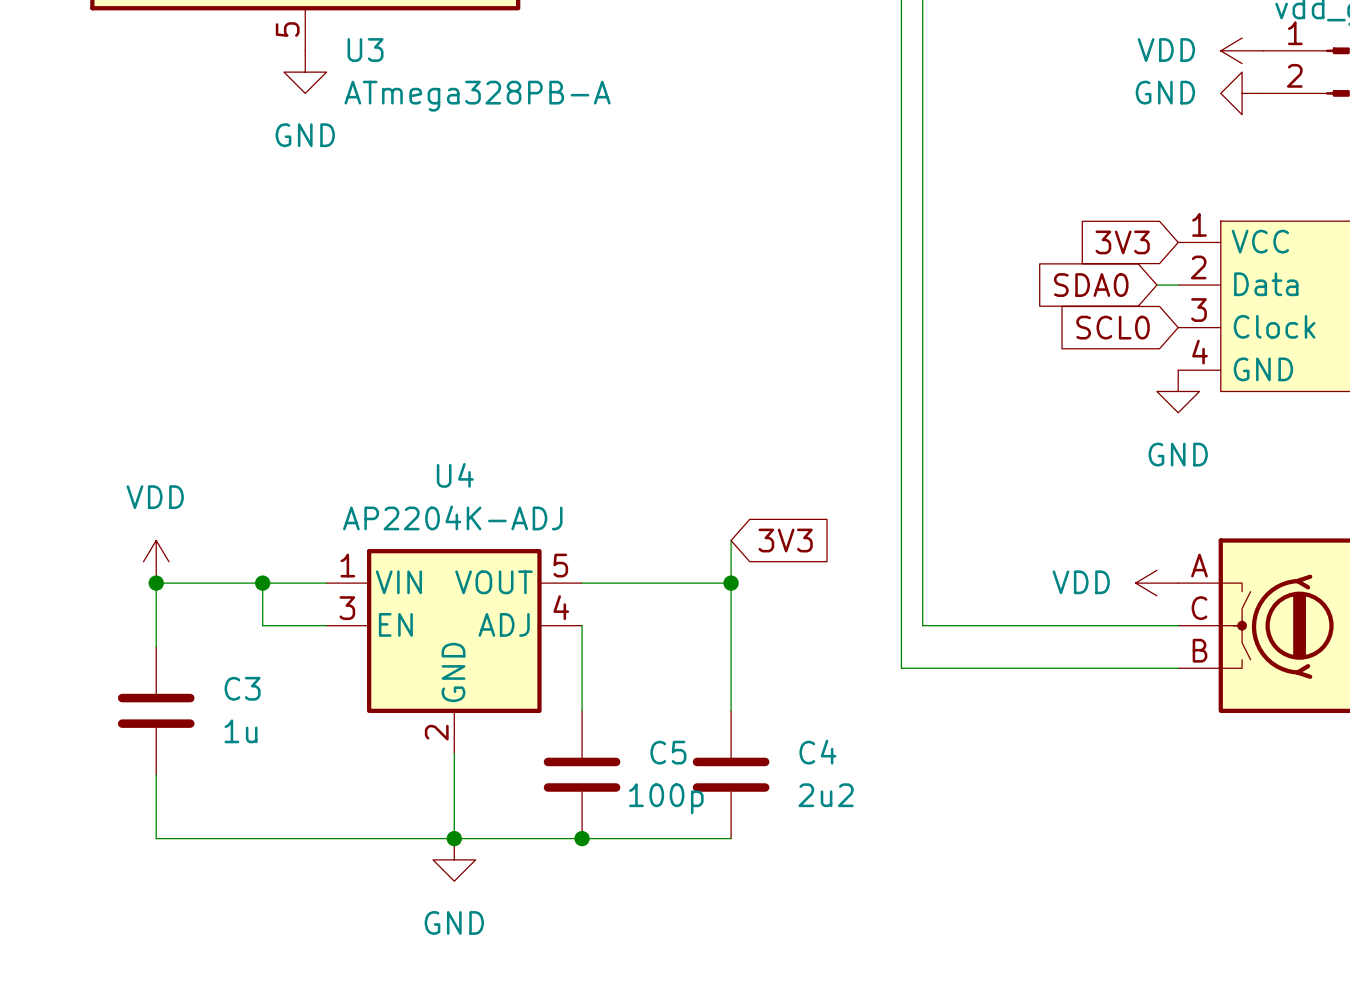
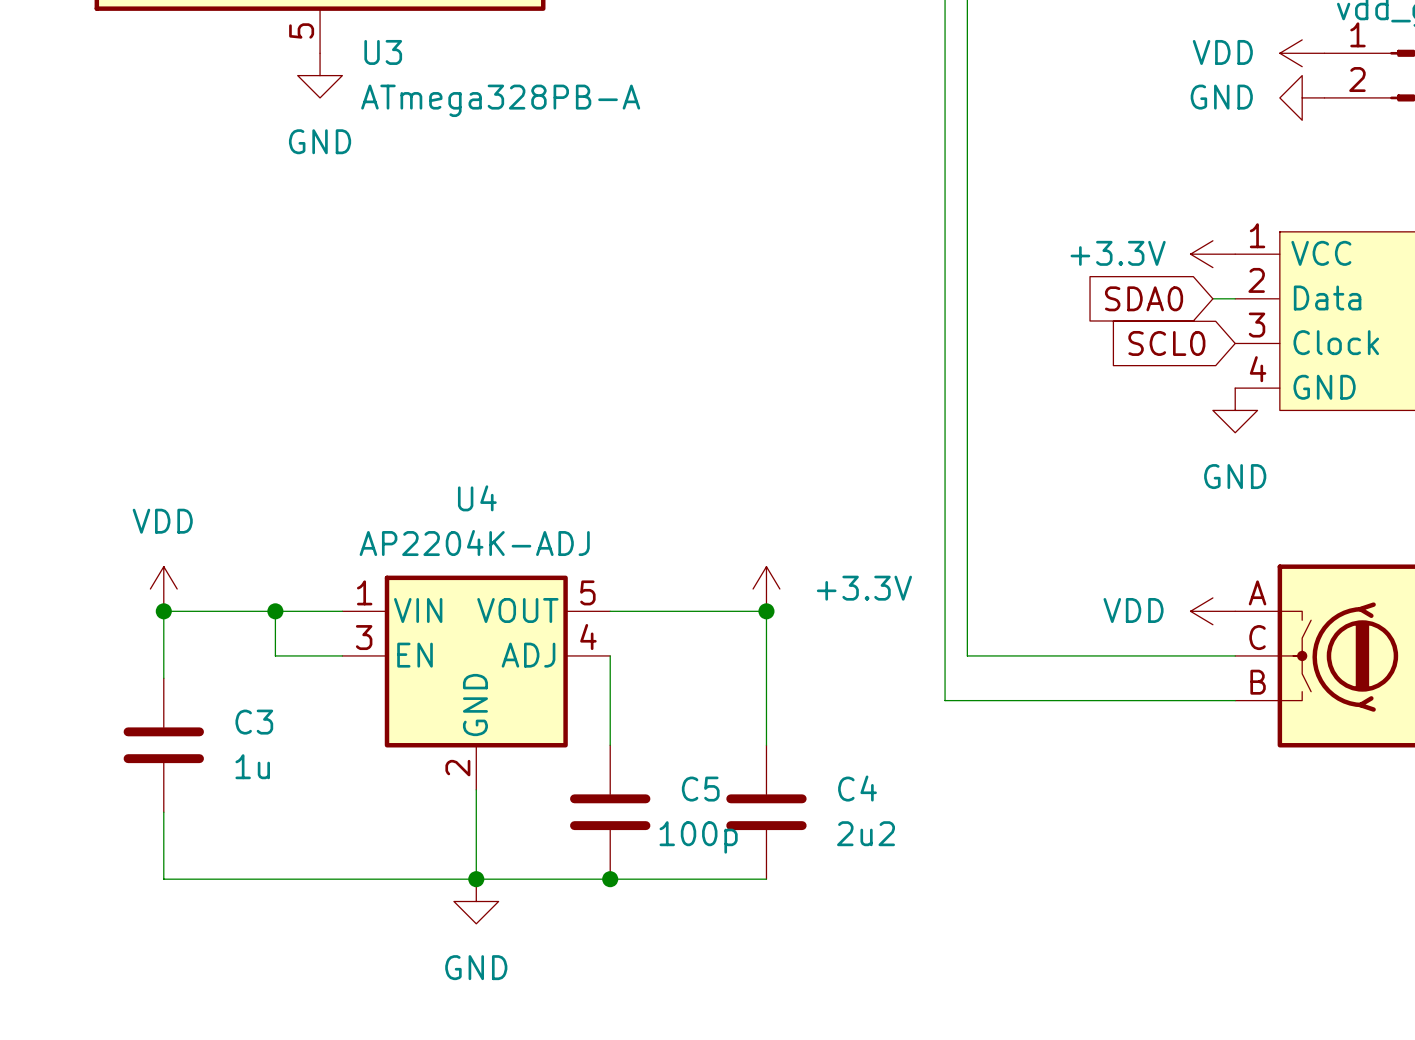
global label: 3V3 (1122, 242) -> none
power symbol: none -> +3.3V (1212, 254)
global label: 3V3 (785, 540) -> none
power symbol: none -> +3.3V (766, 589)

